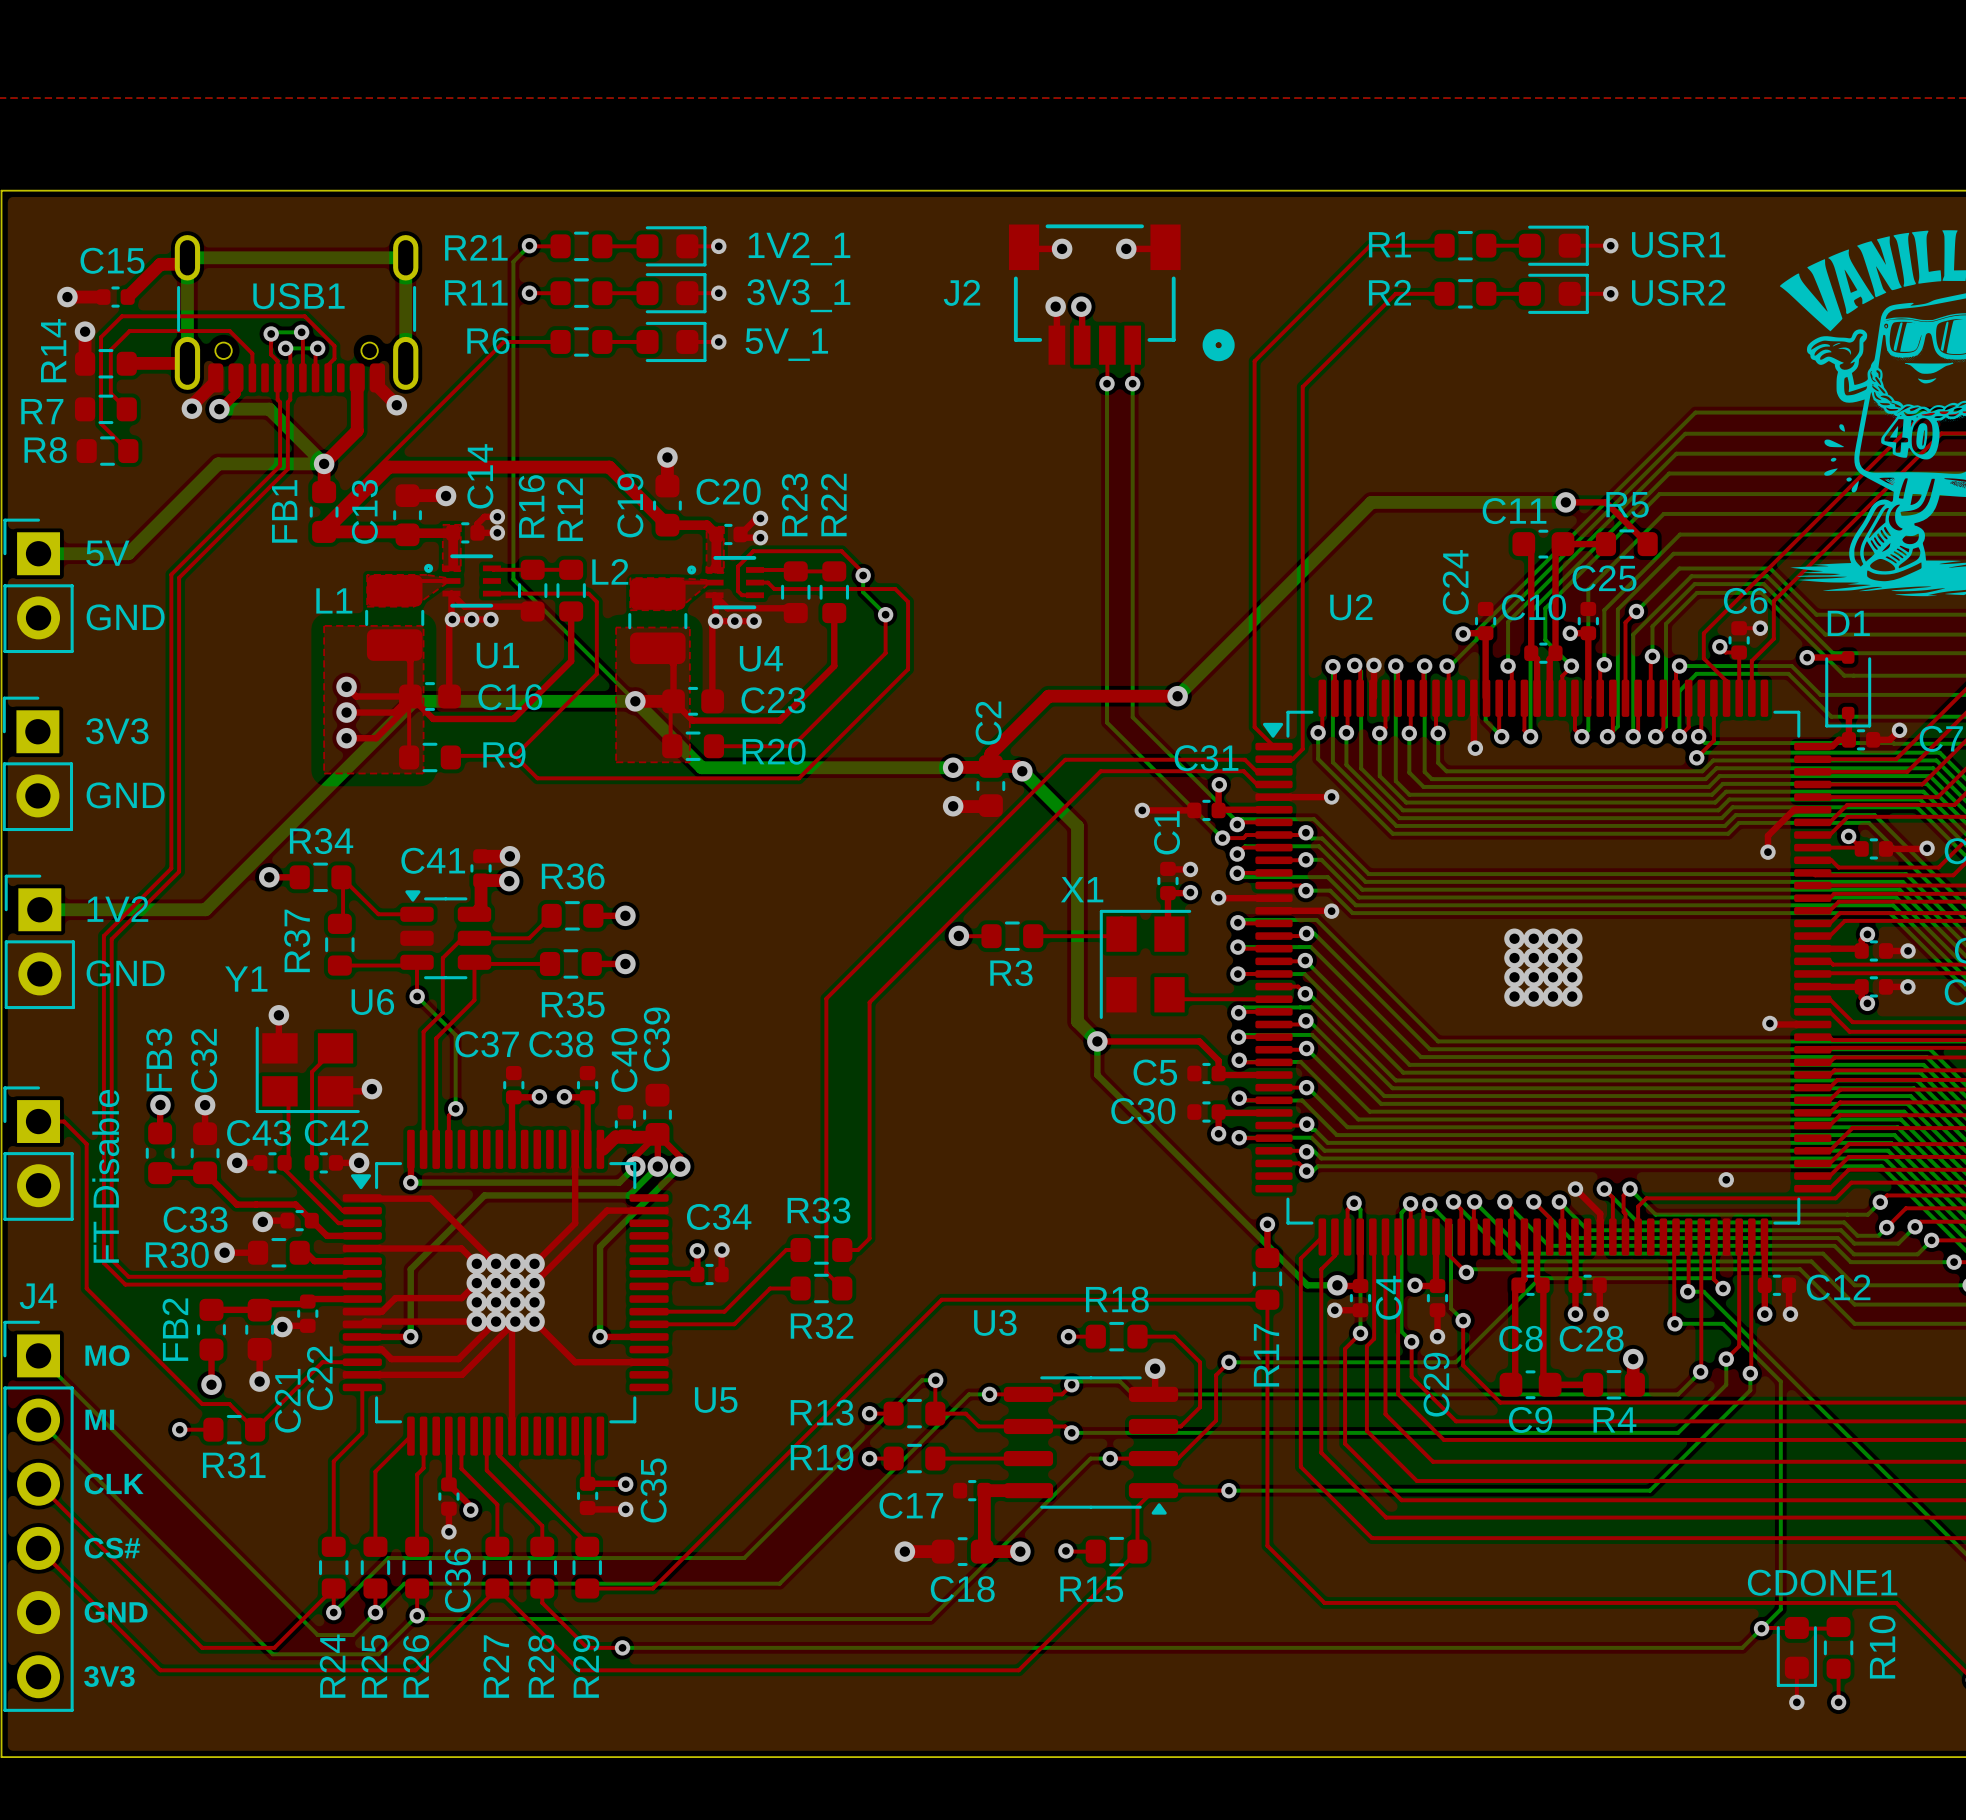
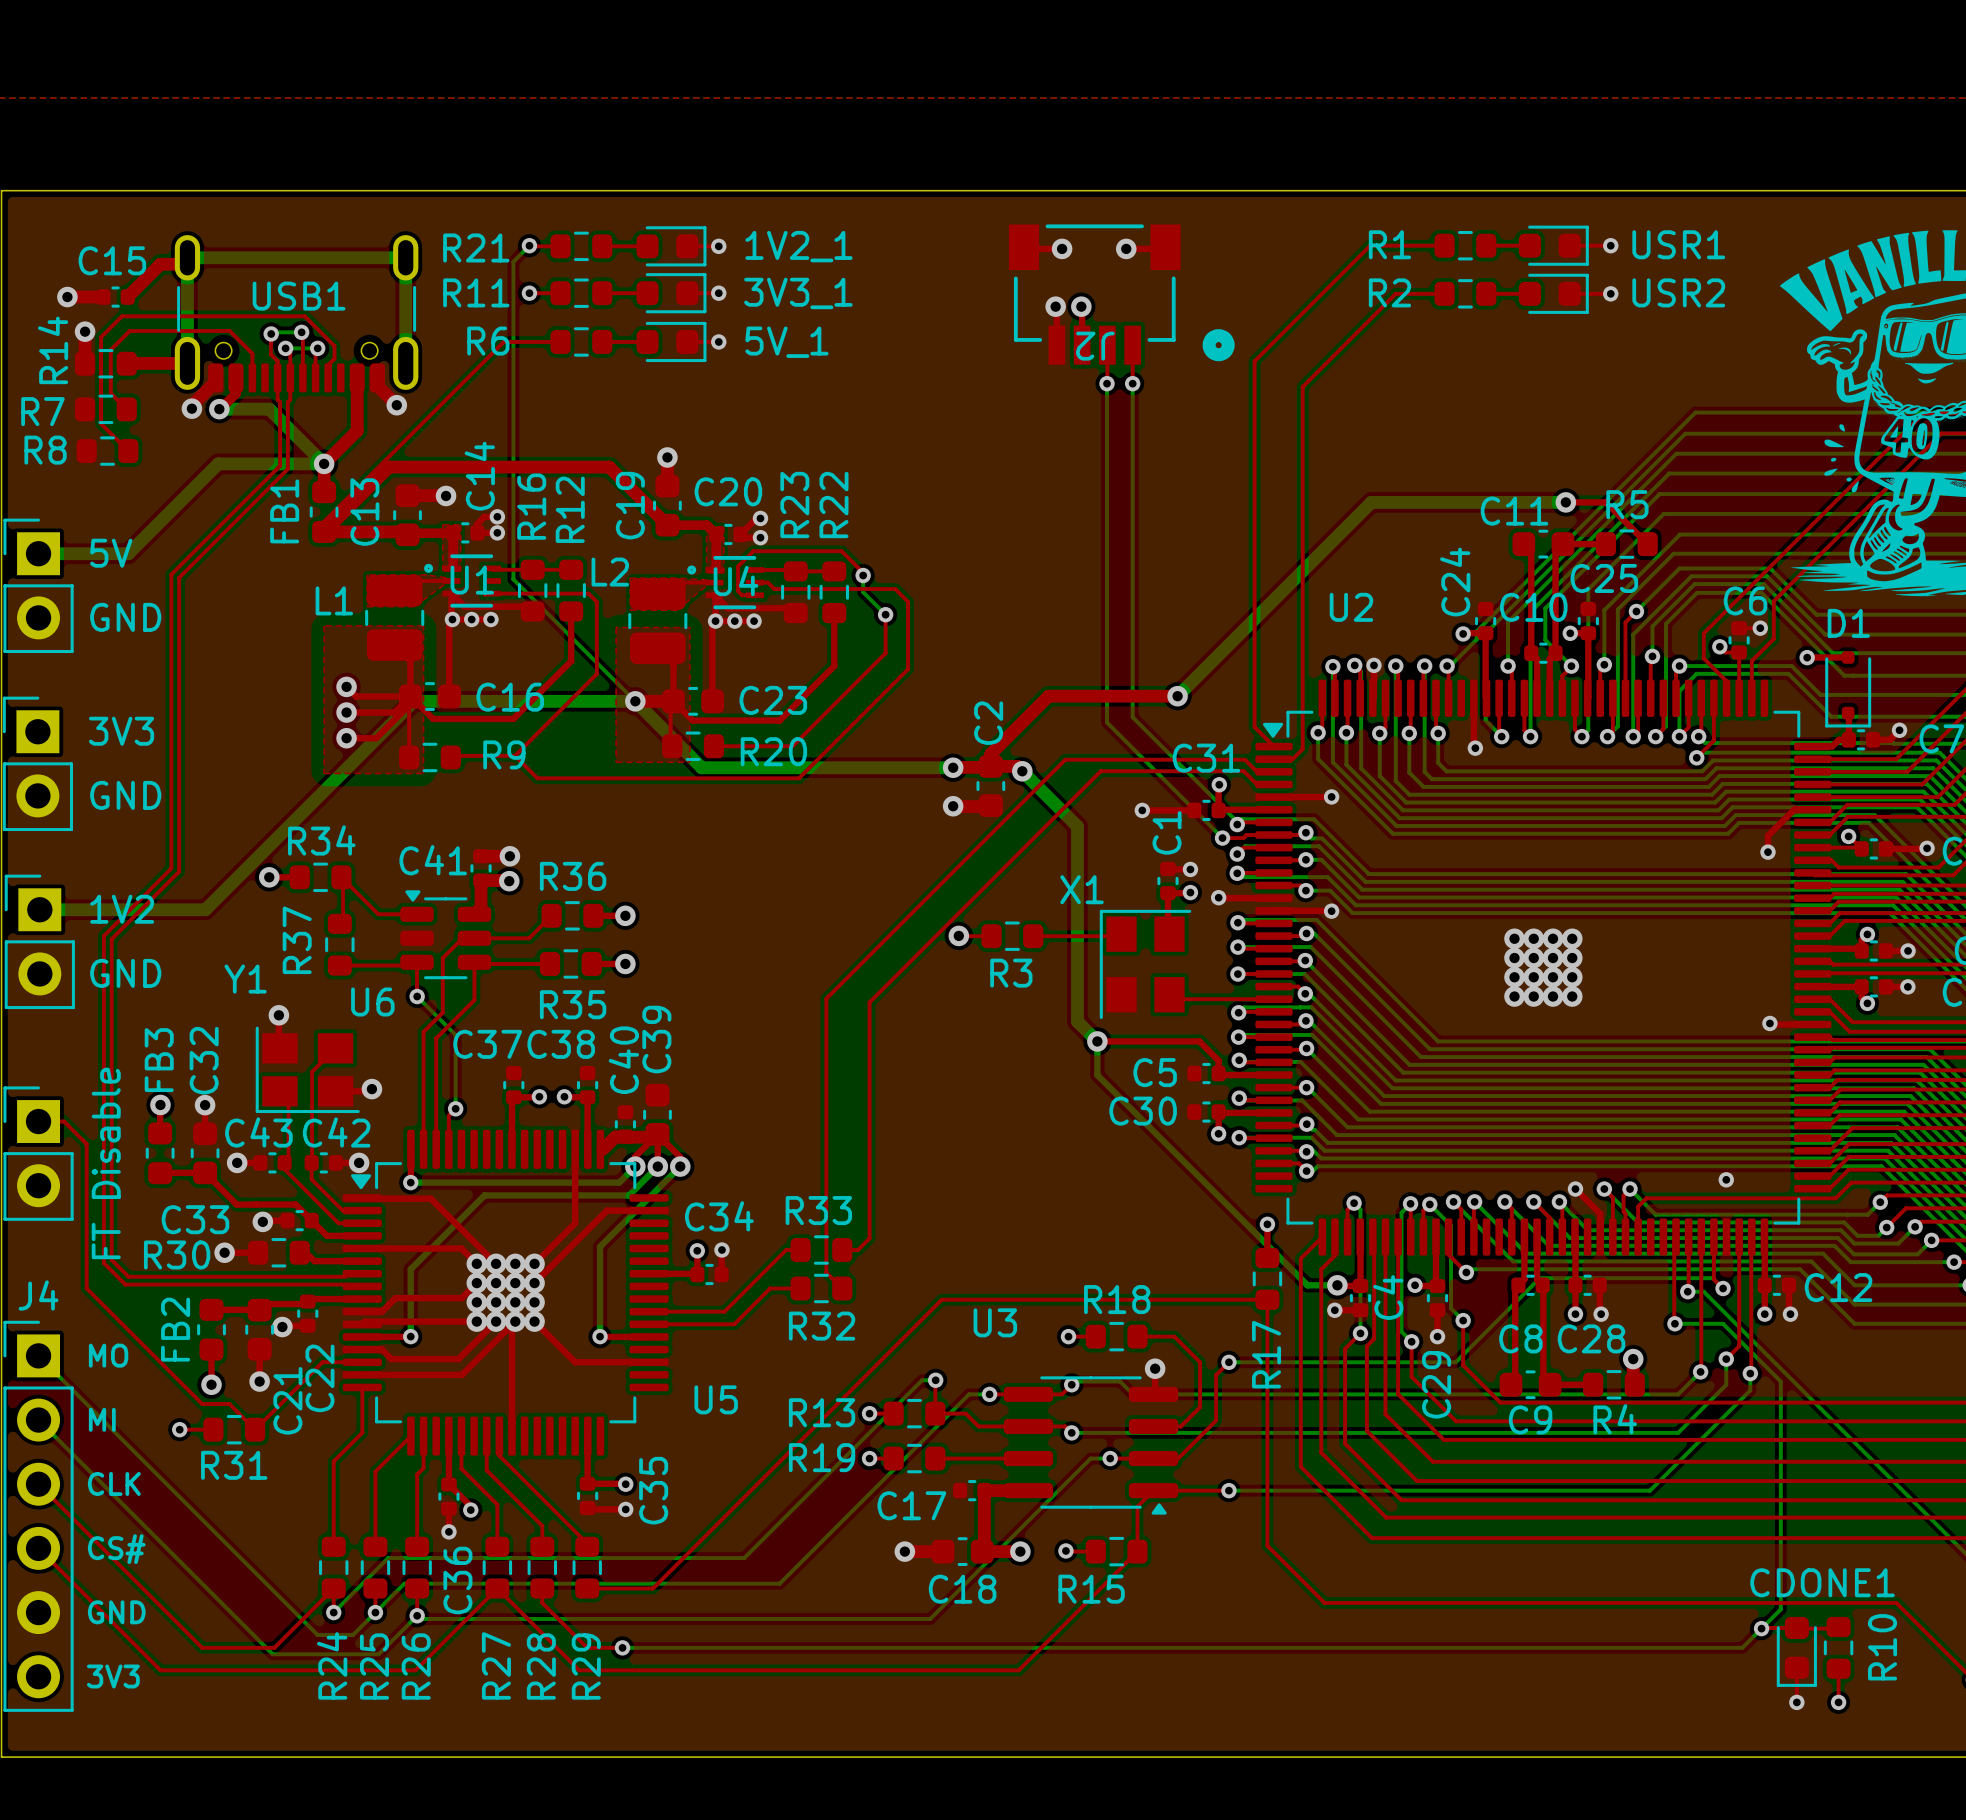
J2 name rotation: 0° (961, 292) -> 180° (1095, 346)
J2 name position: J2 (961, 292) -> J2 (1095, 346)
U1 name position: U1 (497, 655) -> U1 (472, 580)
U4 name position: U4 (761, 658) -> U4 (736, 581)

